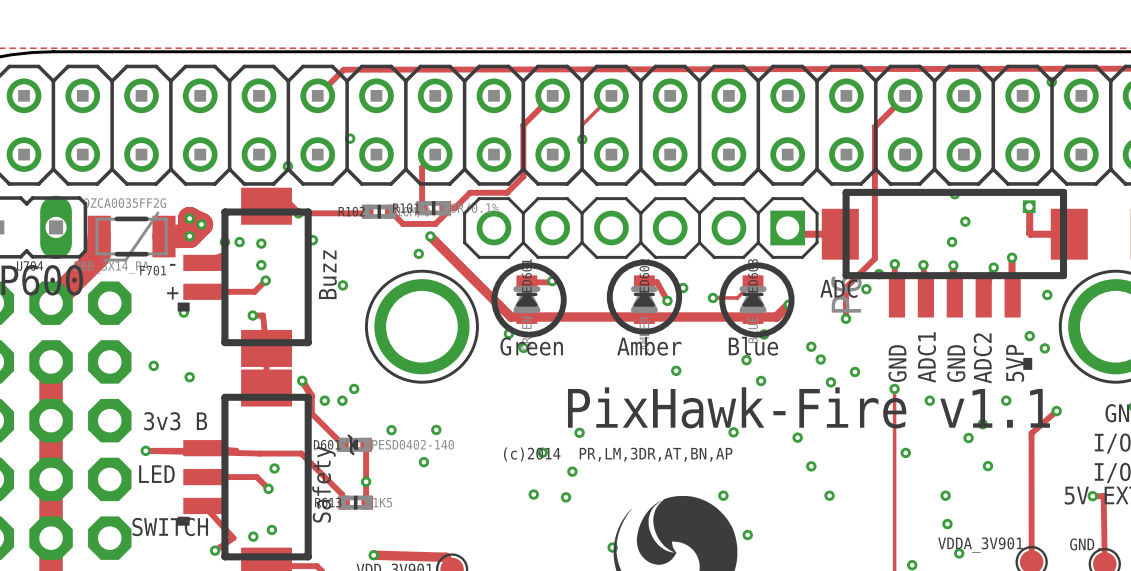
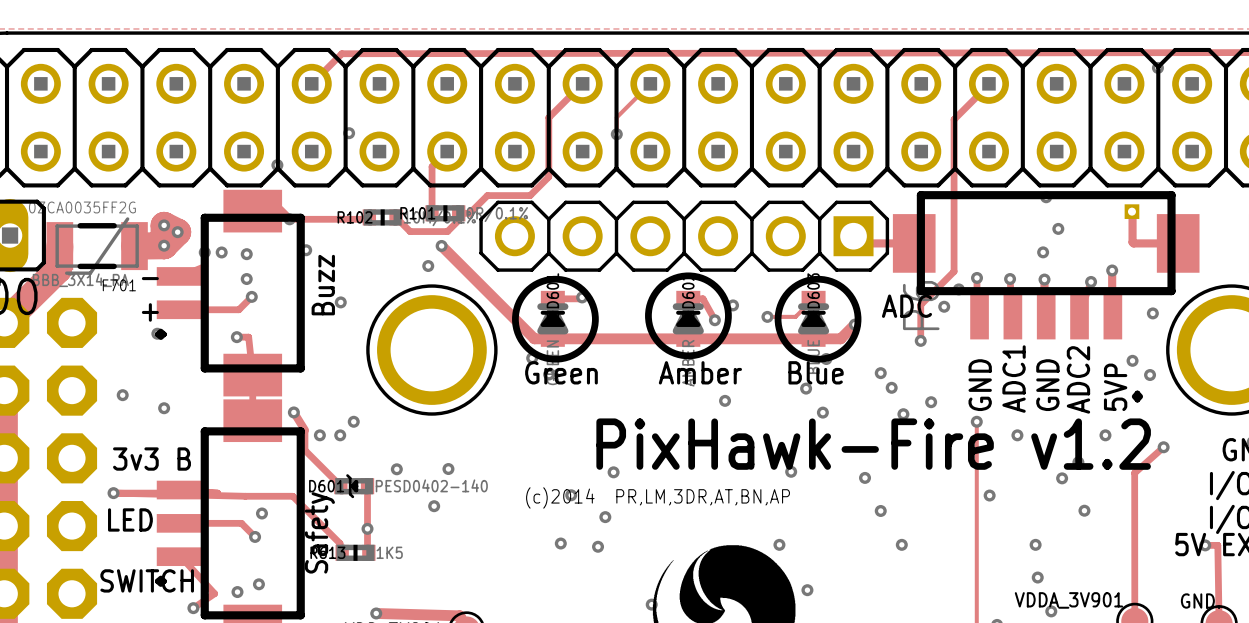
text: PixHawk-Fire v1.1 (808, 407) -> PixHawk-Fire v1.2 (873, 444)

